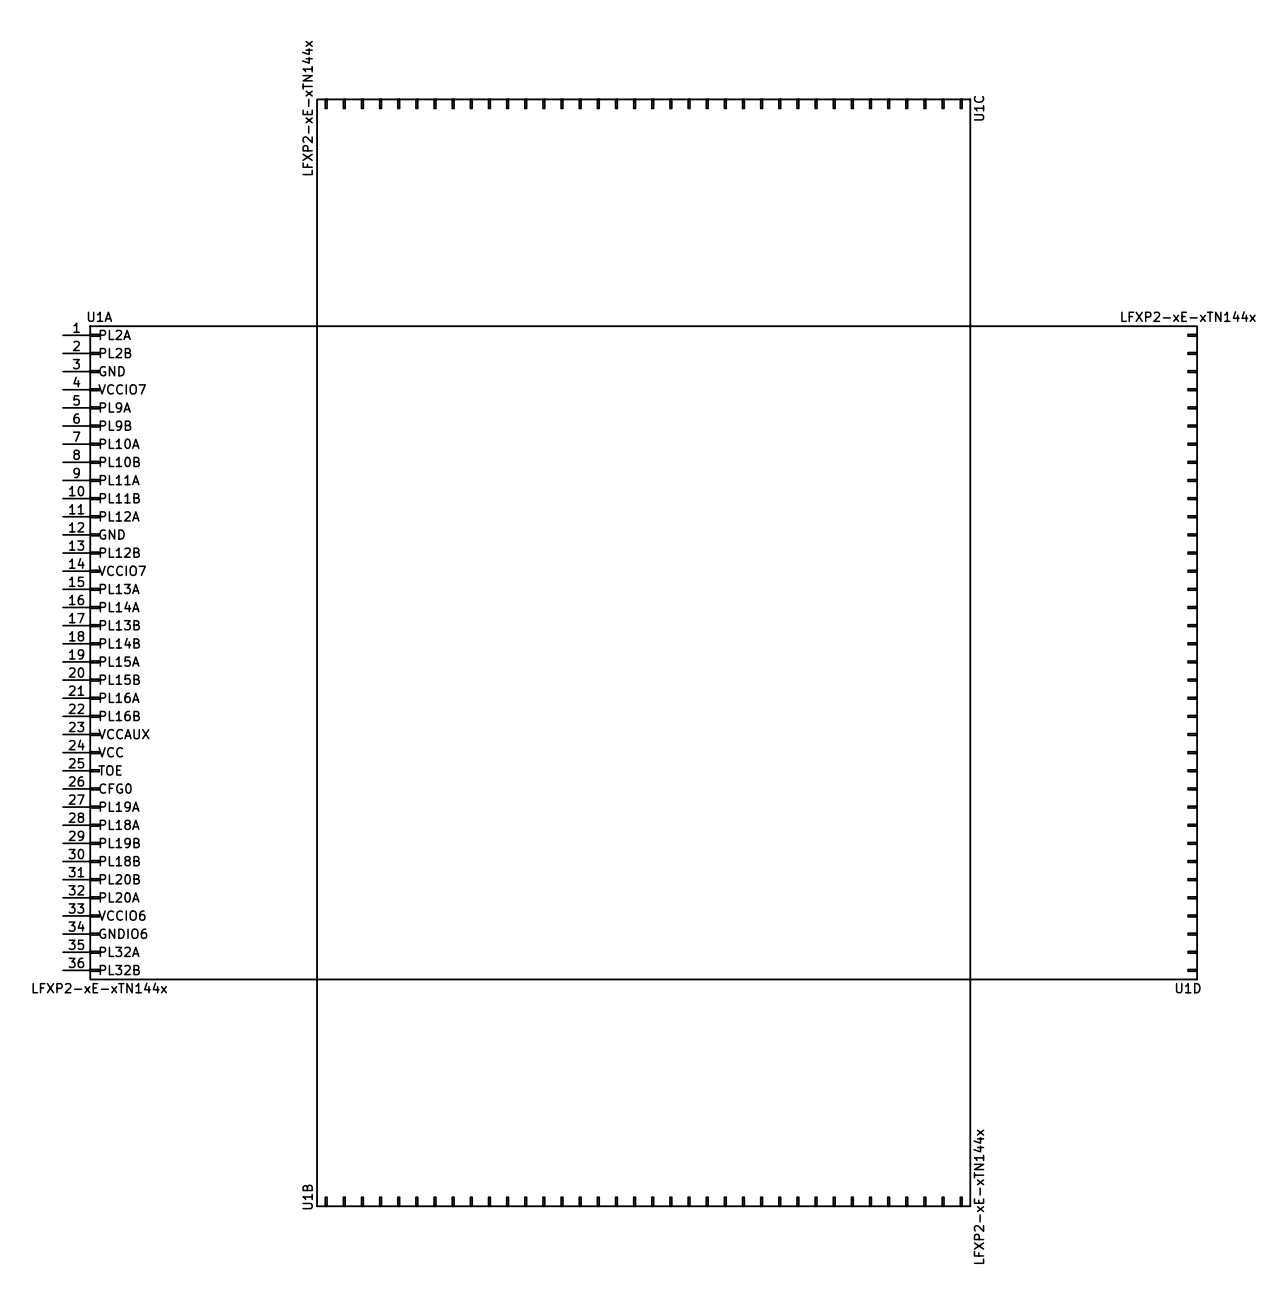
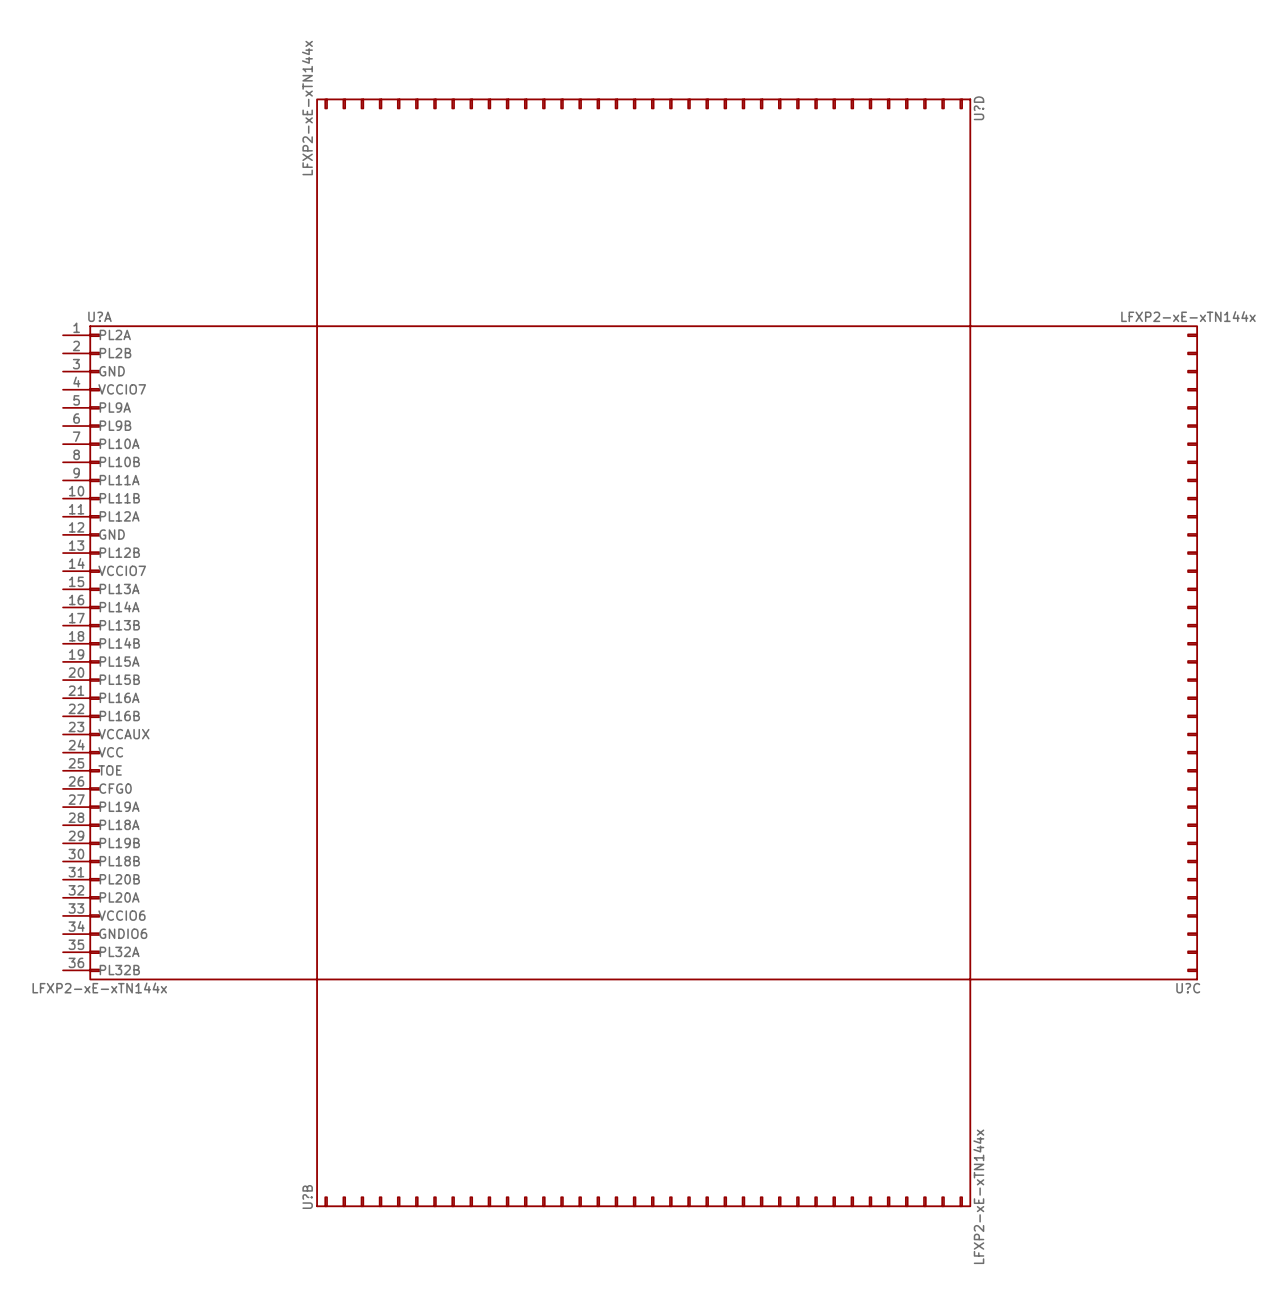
U1C name: U1C (979, 108) -> U?D (979, 108)
U1A name: U1A (99, 316) -> U?A (99, 316)
U1D name: U1D (1188, 988) -> U?C (1188, 988)
U1B name: U1B (307, 1196) -> U?B (307, 1196)

